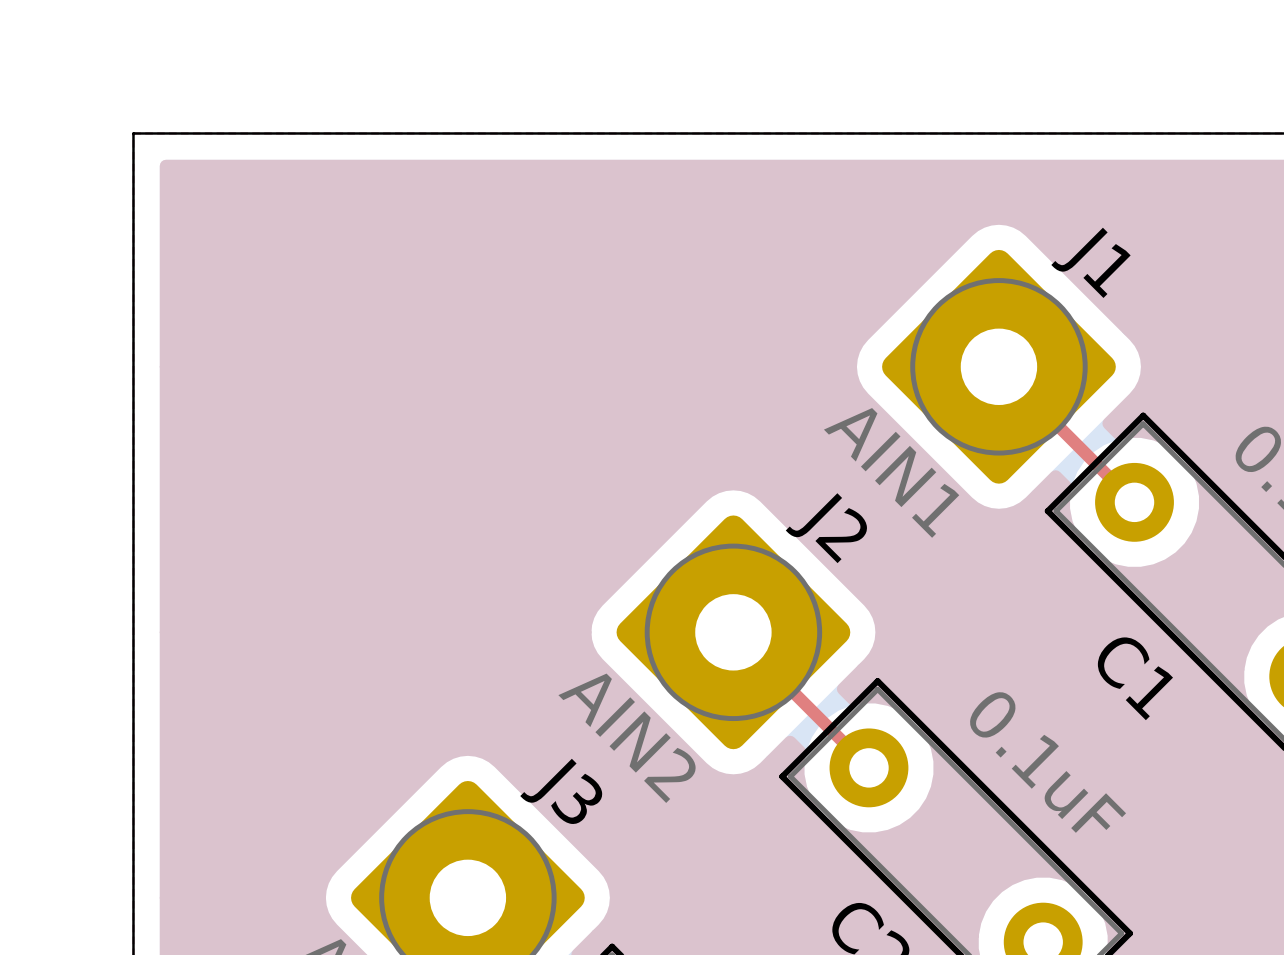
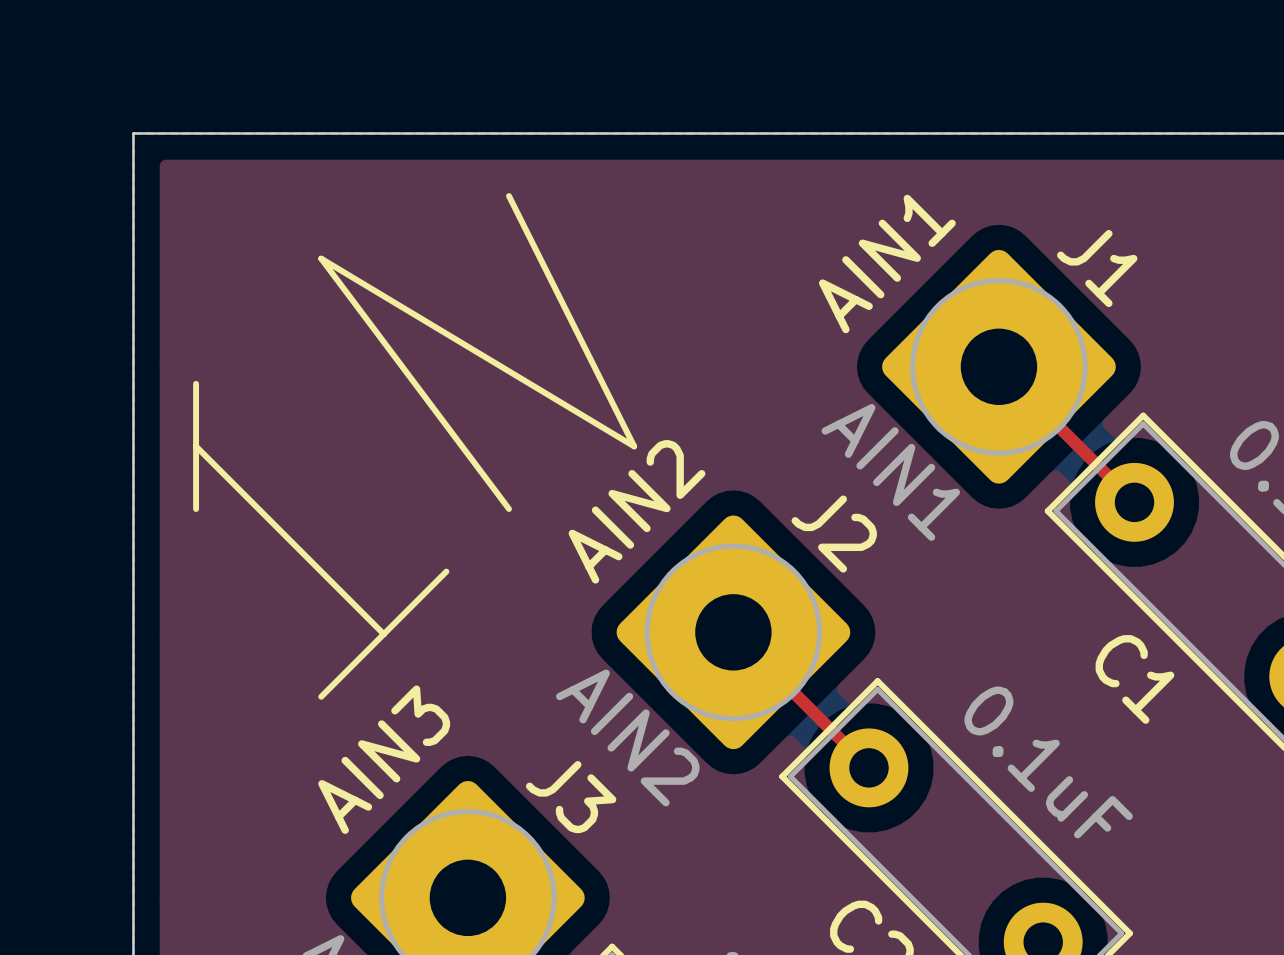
line: none -> (509, 196) (634, 446) (321, 258) (509, 509)
text: none -> AIN1 (887, 263)
line: none -> (196, 383) (196, 509)
line: none -> (196, 446) (383, 634)
text: none -> AIN2 (637, 511)
line: none -> (446, 571) (321, 696)
text: none -> AIN3 (384, 759)

